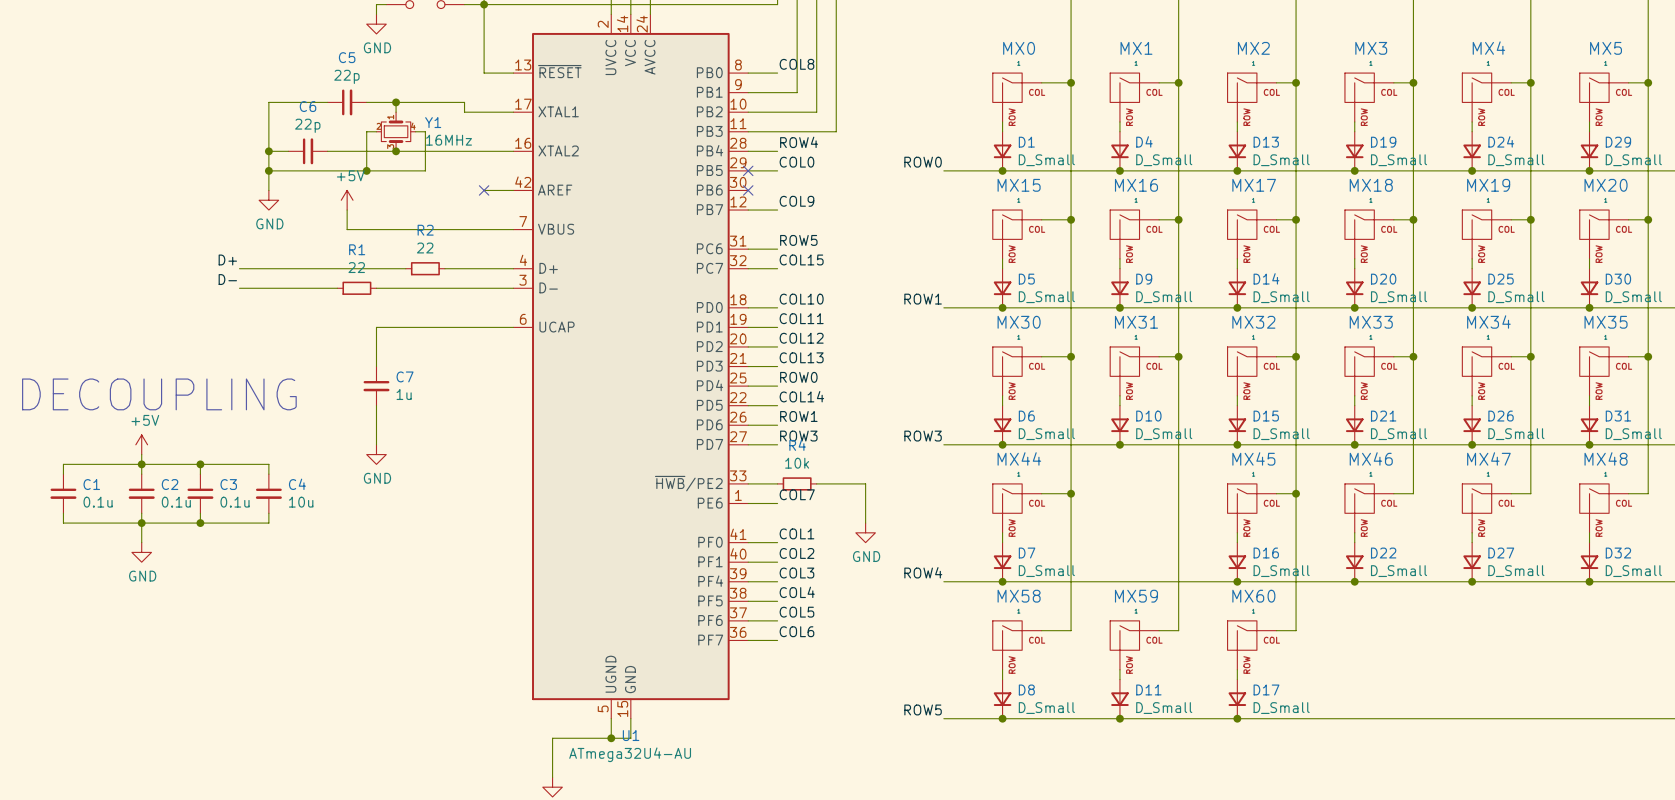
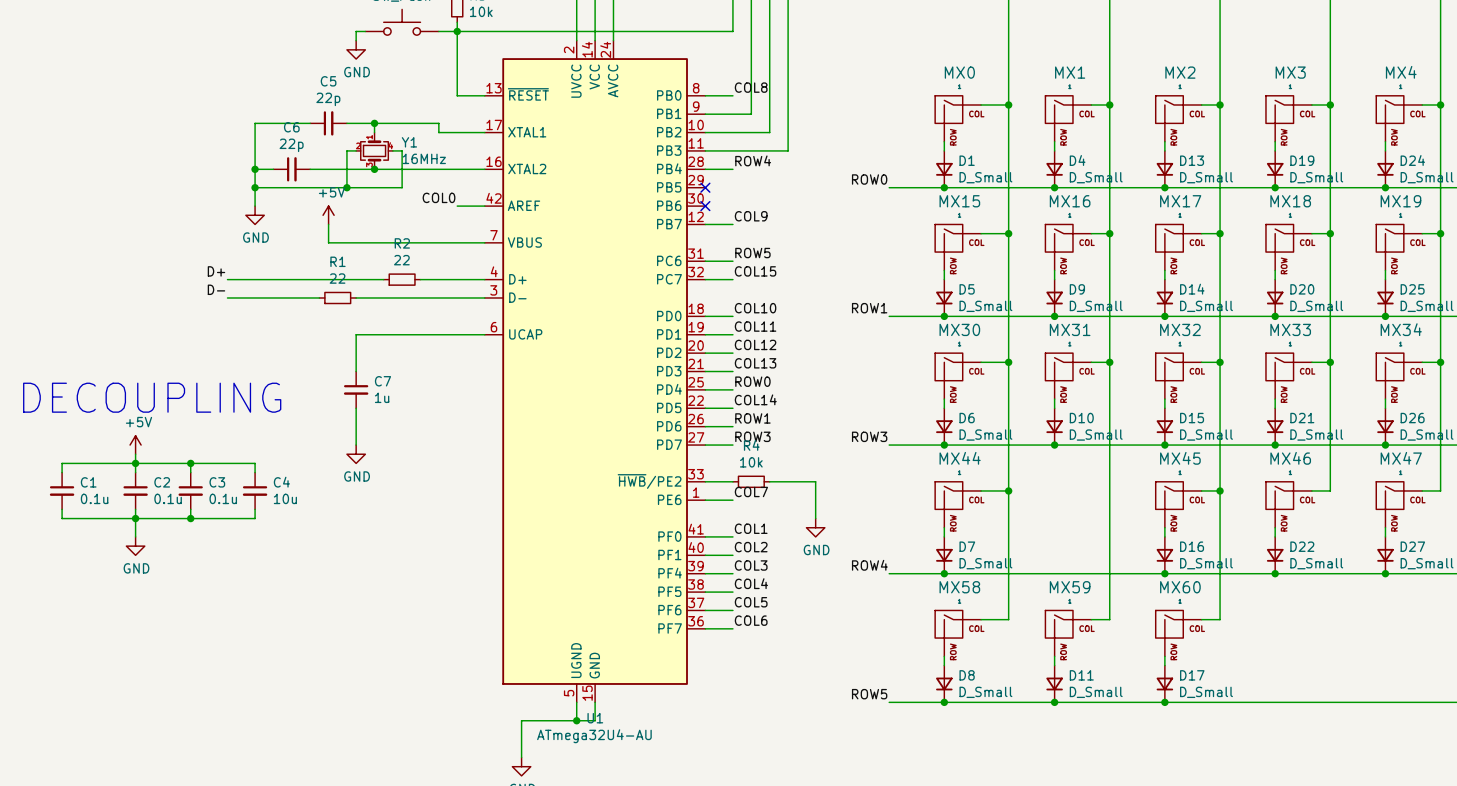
label: COL0 (796, 162) -> none
wire: (748, 170) (777, 170) -> none
label: none -> COL0 (439, 197)
no-connect mark: (484, 190) -> none

